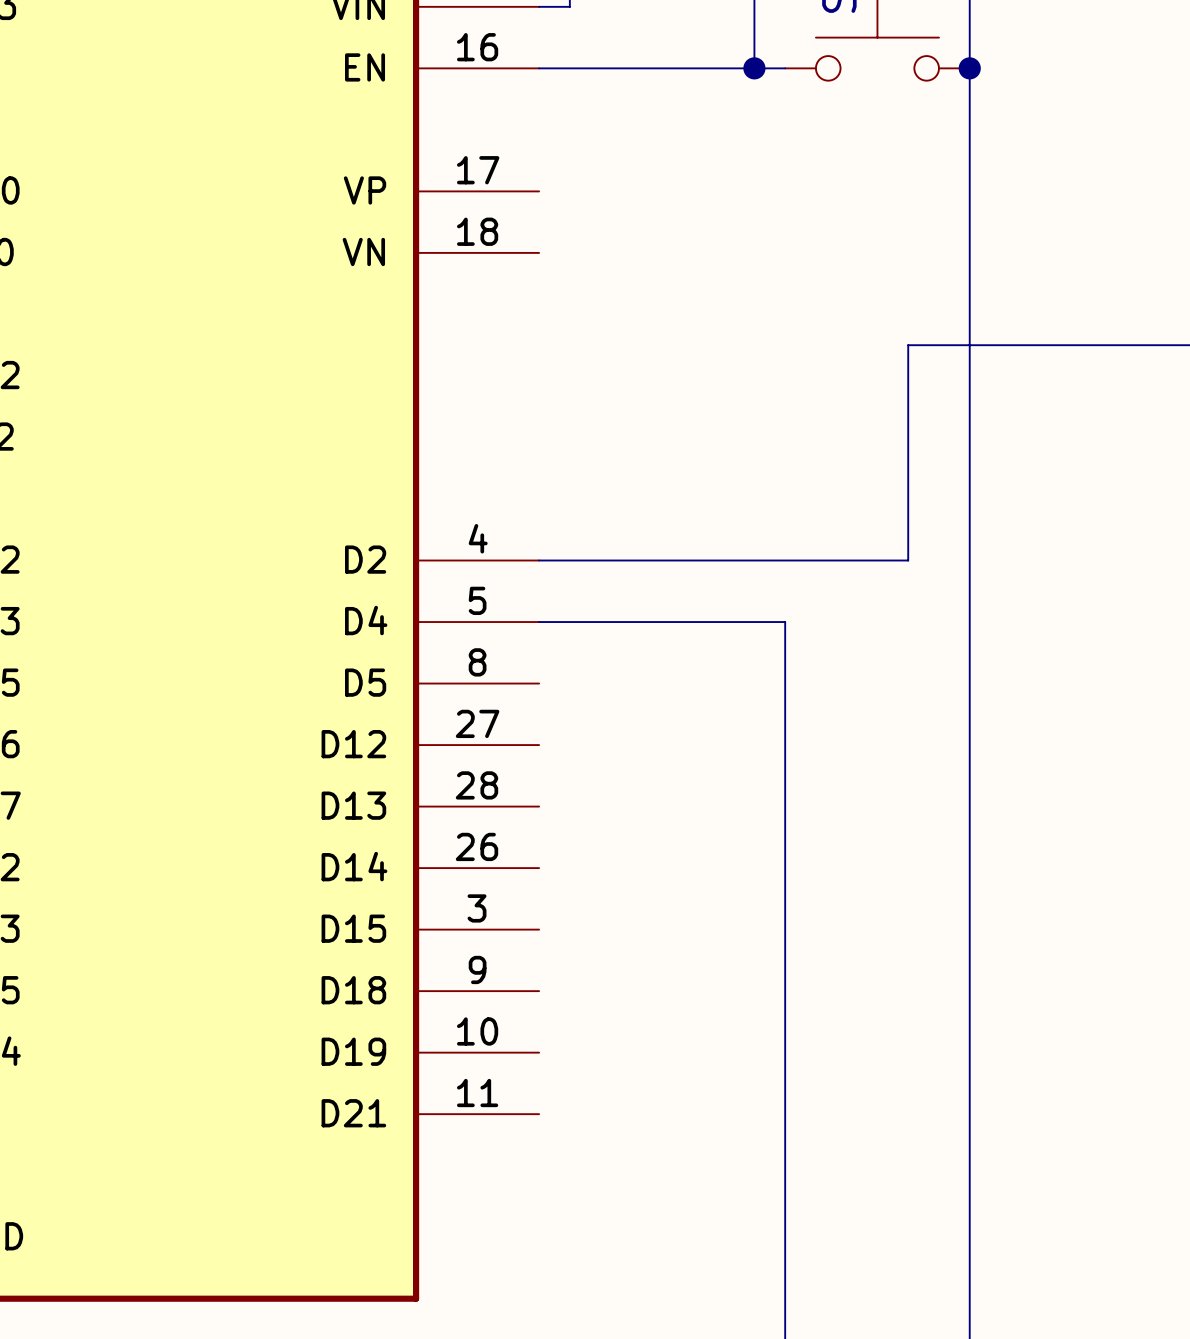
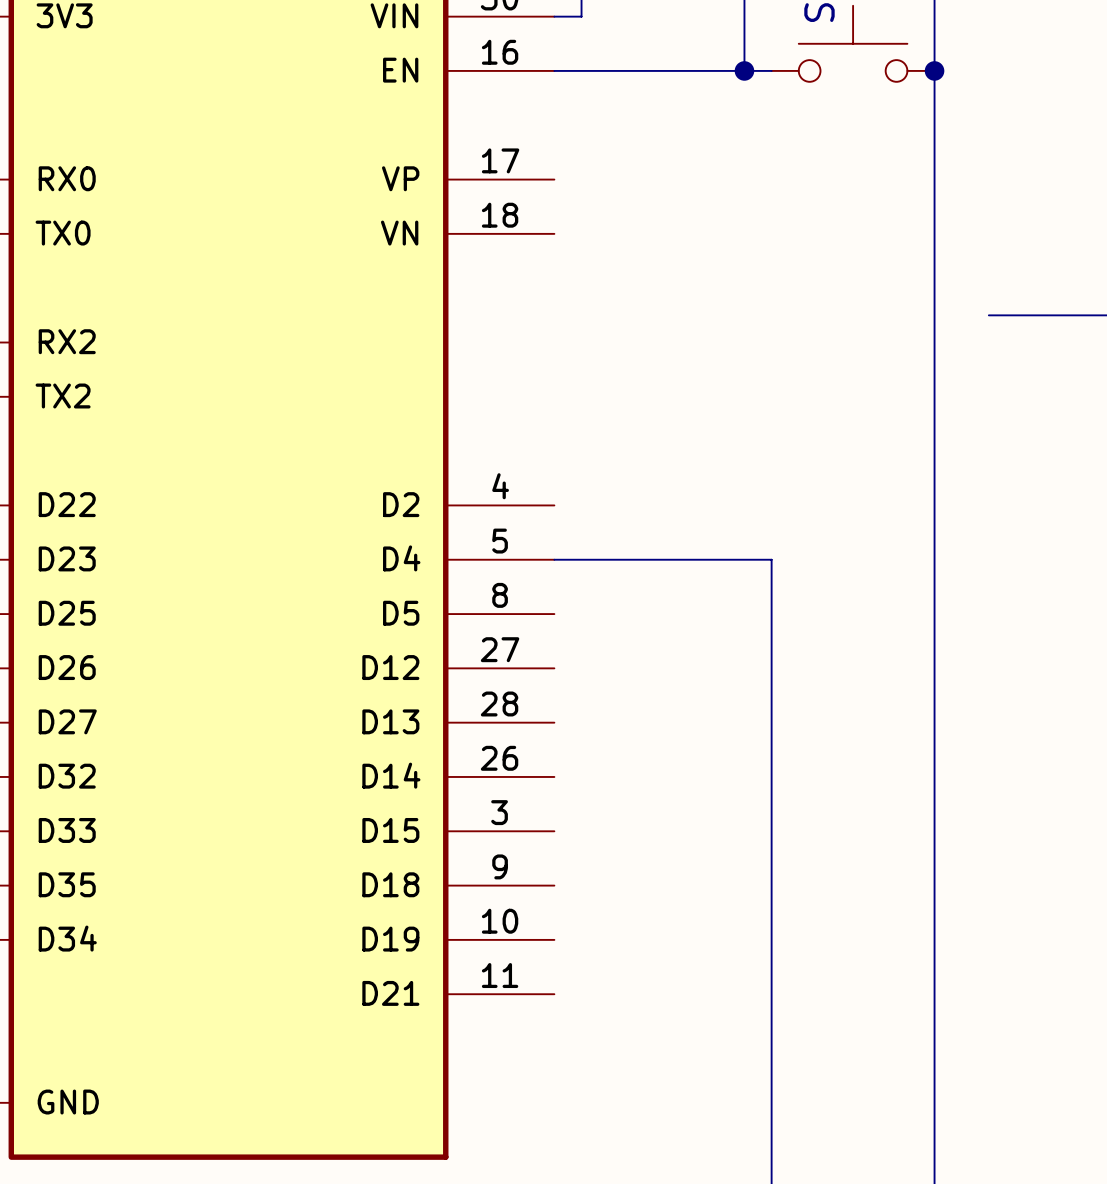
wire: (1031, 345) (908, 345) (908, 560) (539, 560) -> none

